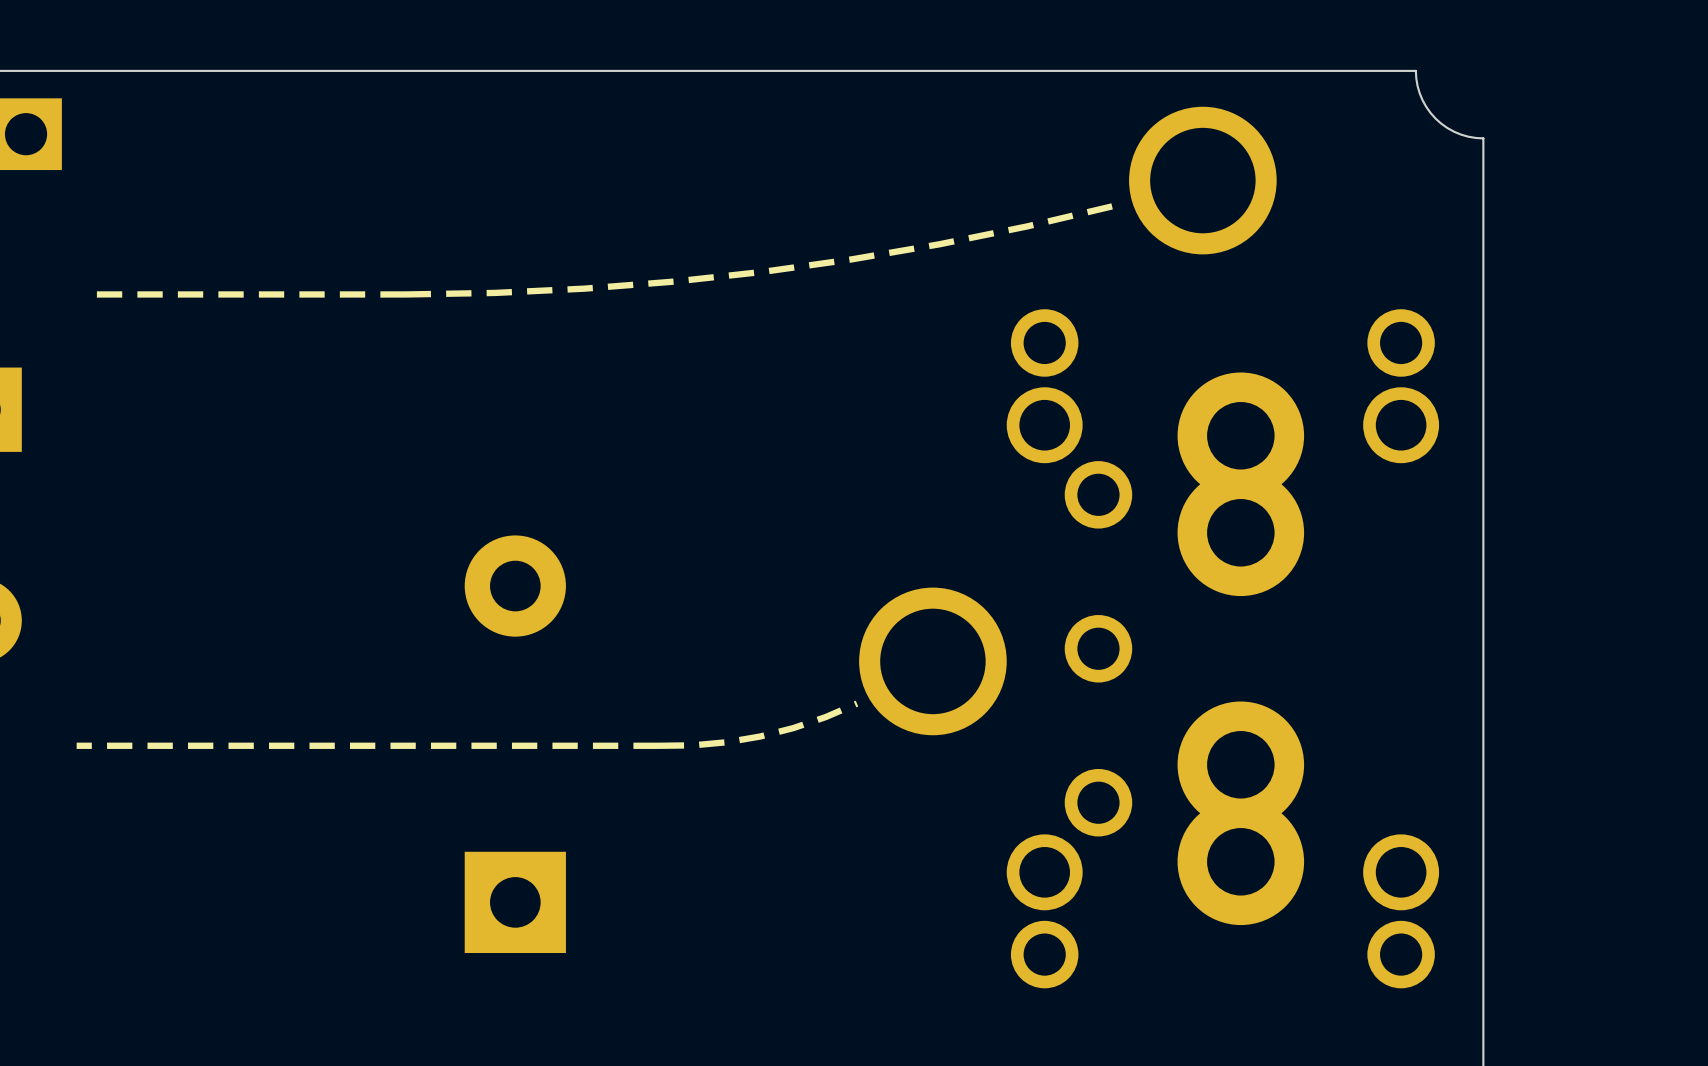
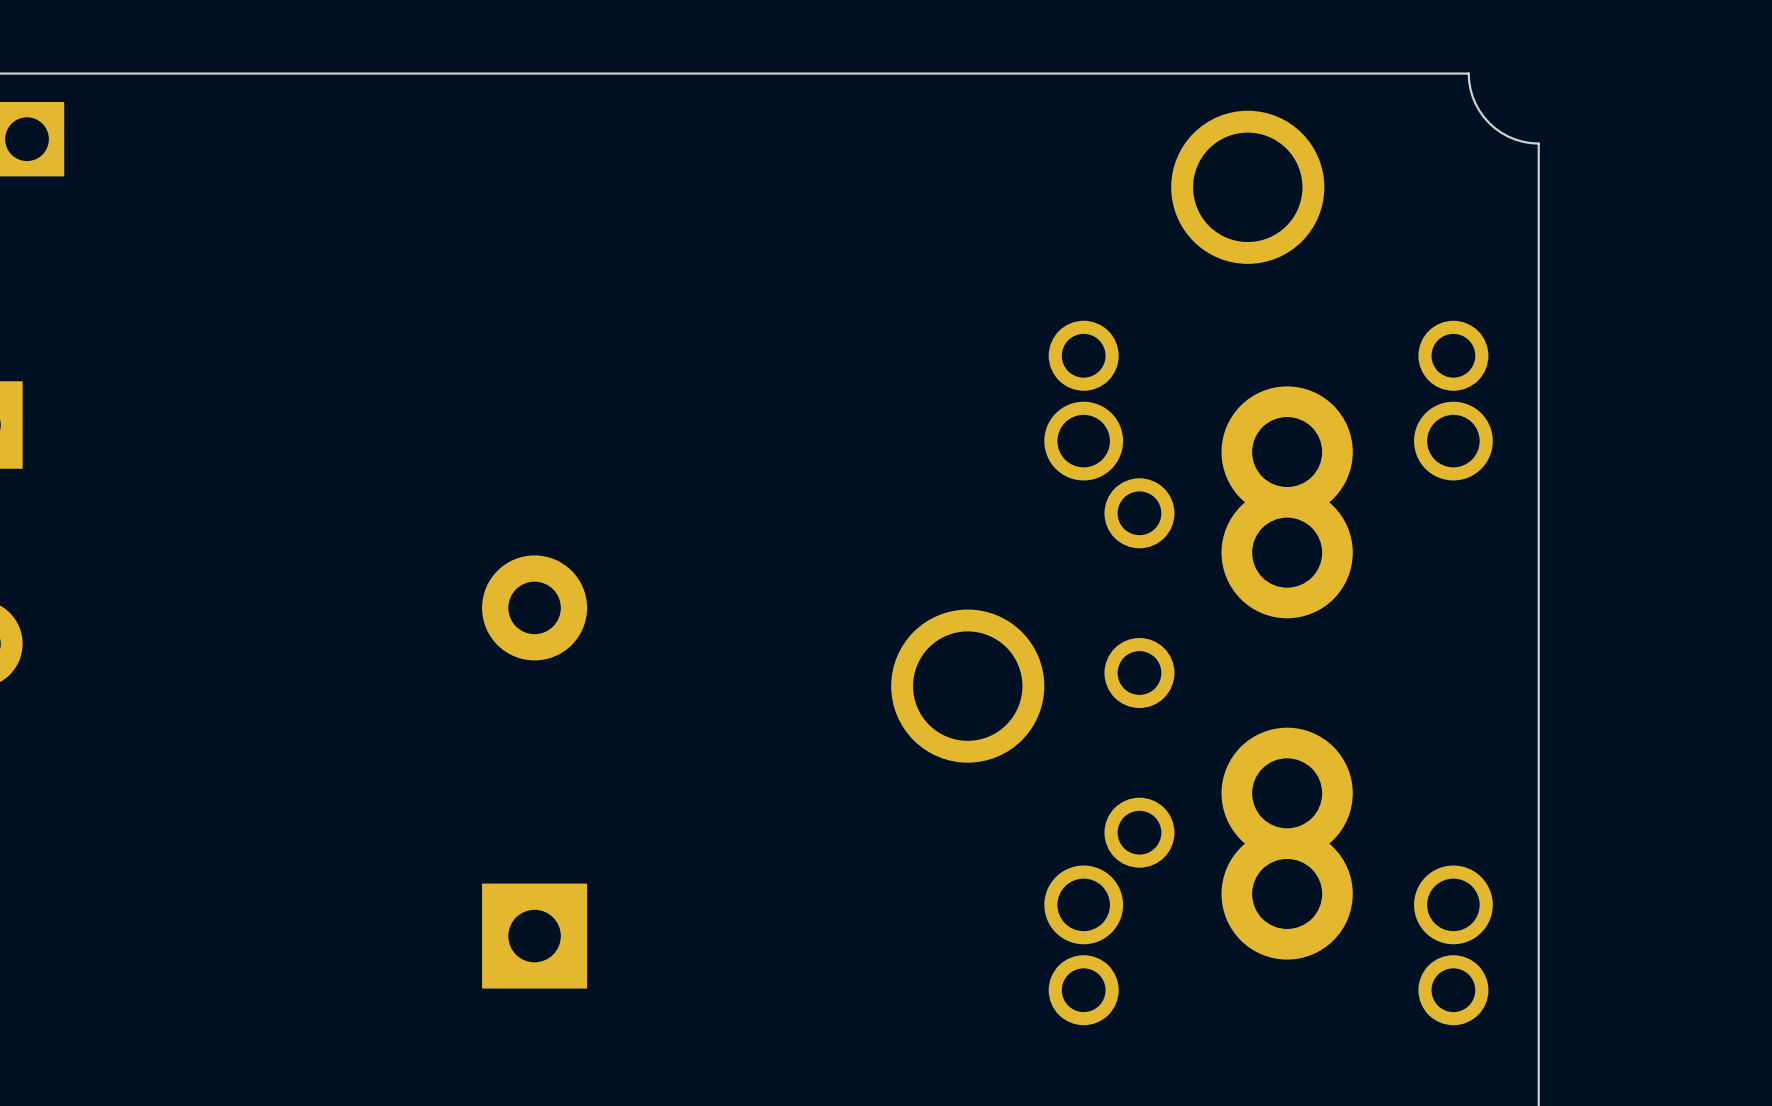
line: (1114, 205) (939, 244) (851, 259) (673, 281) (495, 292) (93, 294) -> none
line: (856, 703) (793, 728) (726, 742) (692, 745) (76, 745) -> none

